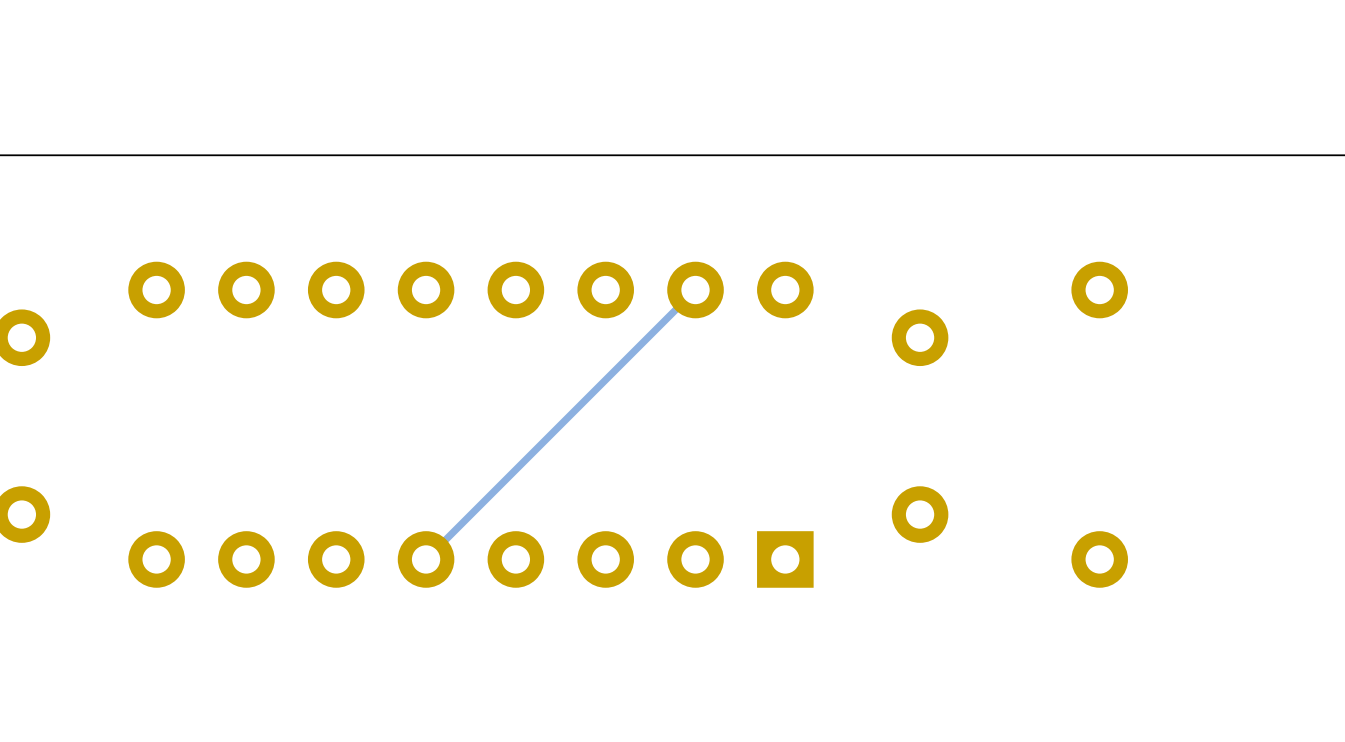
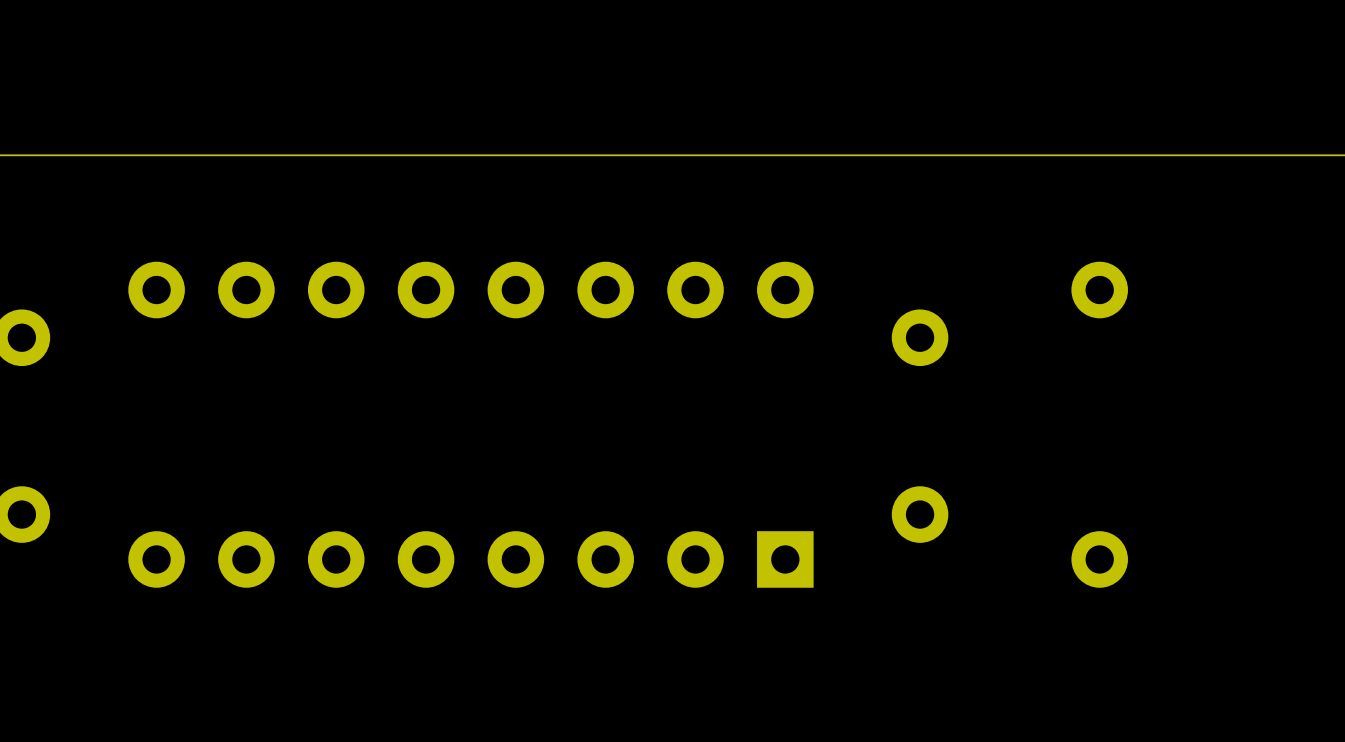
track: (695, 290) (426, 559) -> none

